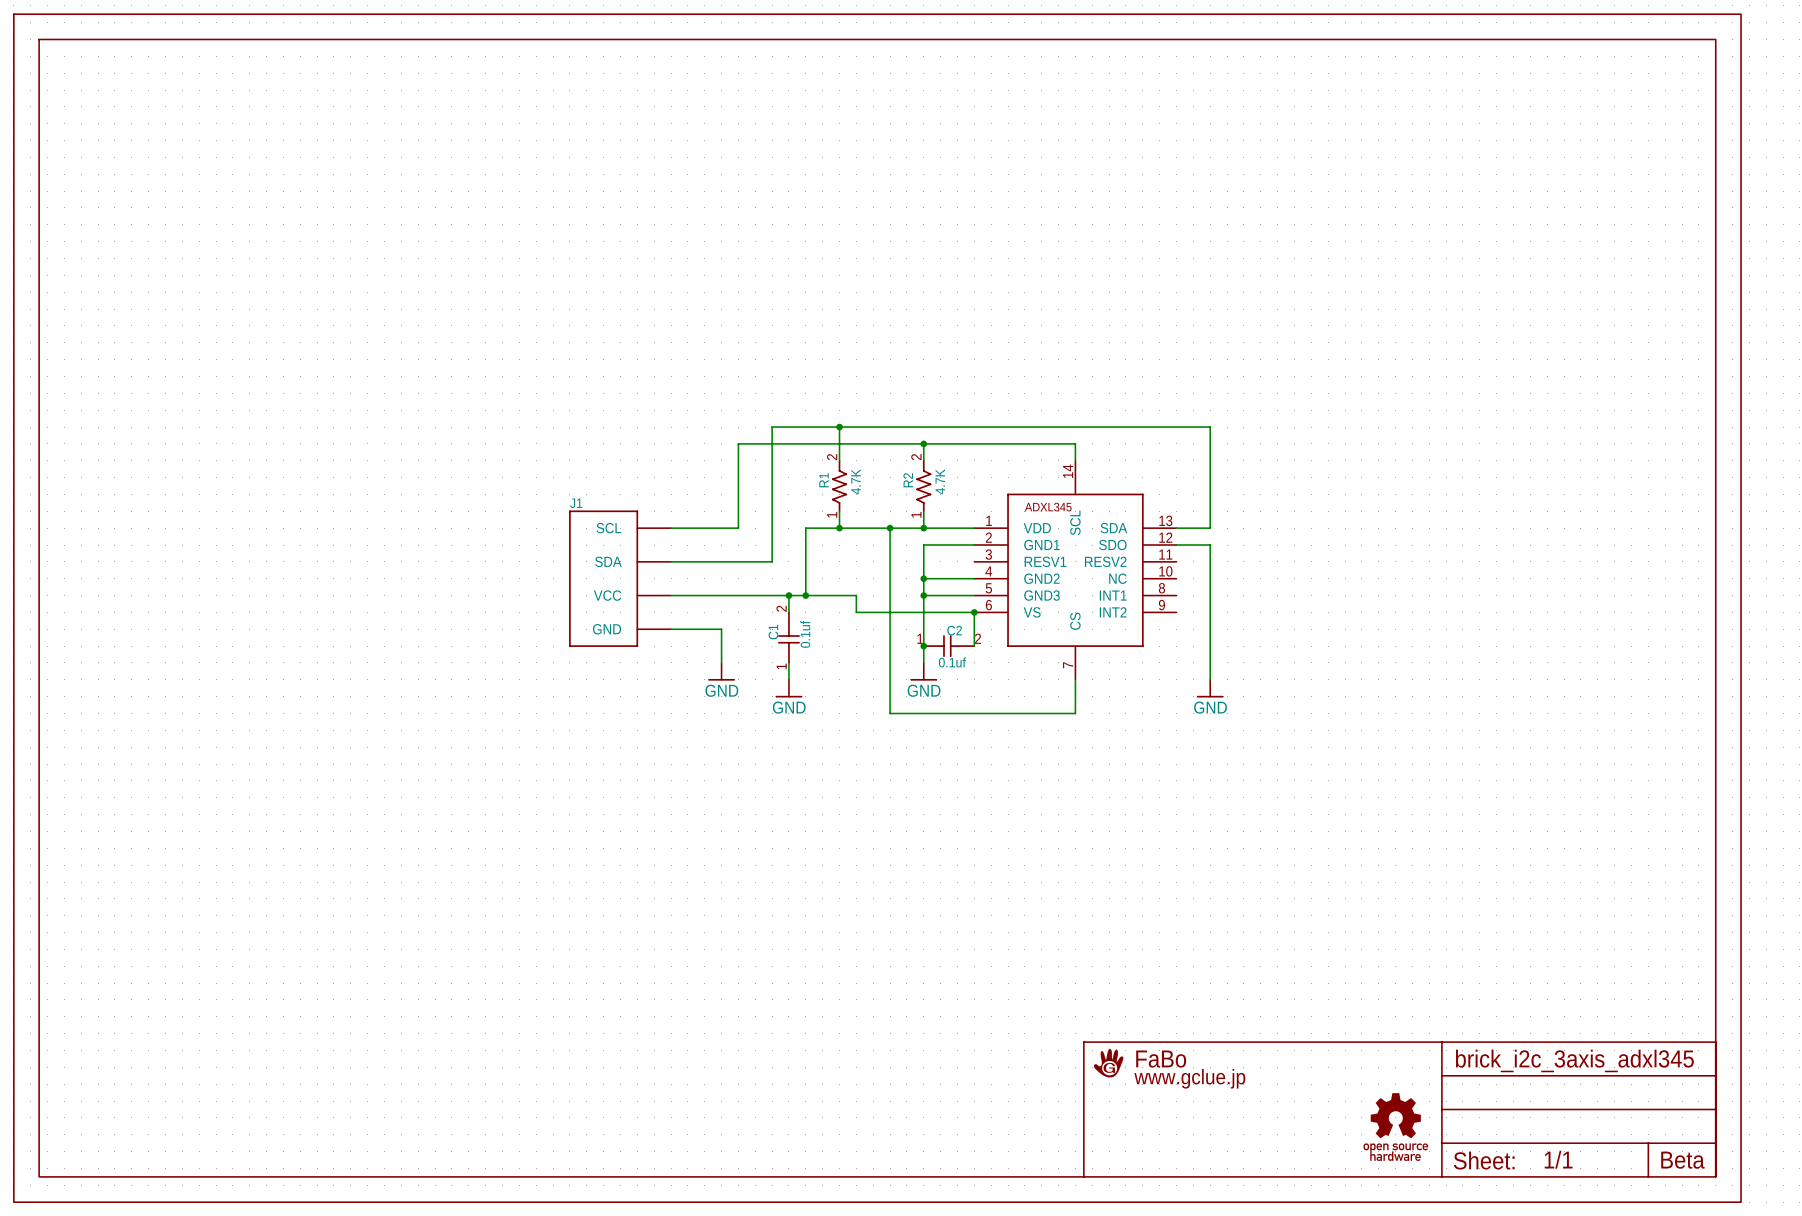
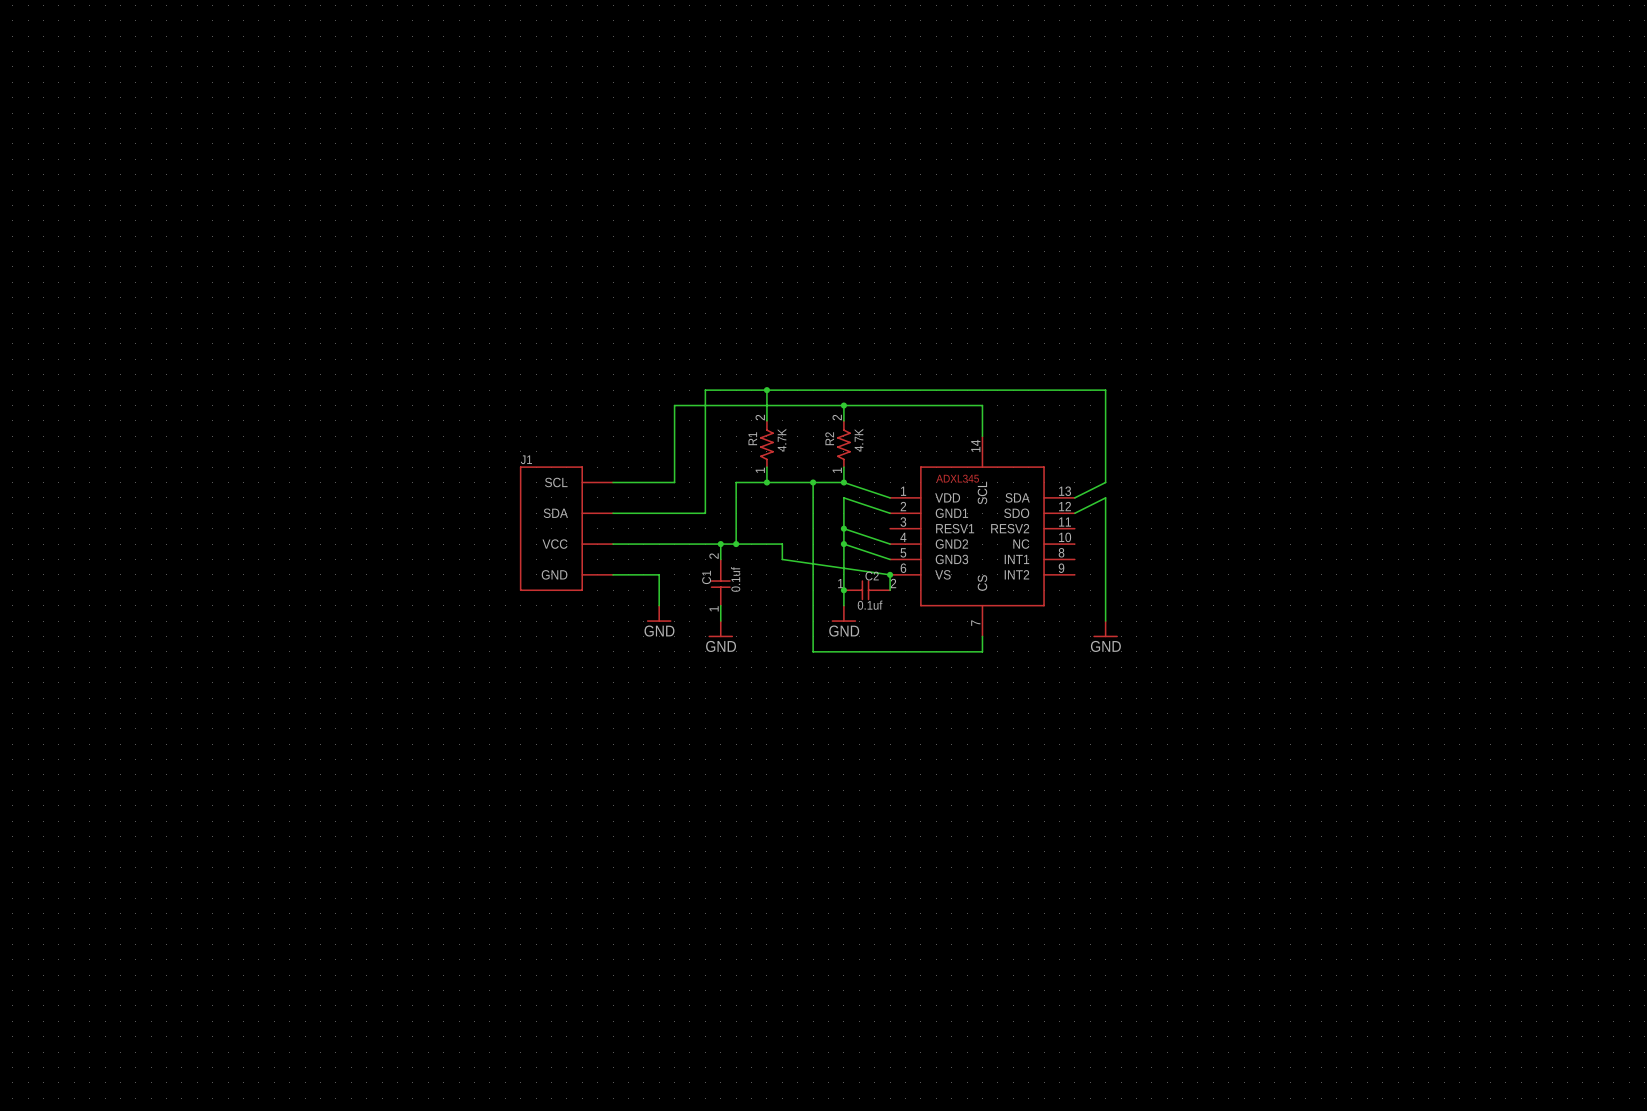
wire: (923, 528) (974, 528) -> (843, 482) (890, 497)
wire: (1176, 528) (1210, 528) -> (1074, 497) (1105, 482)
wire: (923, 545) (974, 545) -> (843, 497) (890, 513)
wire: (1176, 545) (1210, 545) -> (1074, 513) (1105, 497)
part position: (1075, 570) -> (982, 536)
wire: (923, 578) (974, 578) -> (843, 528) (890, 544)
wire: (923, 595) (974, 595) -> (843, 544) (890, 559)
part: (877, 608) -> none
wire: (856, 612) (974, 612) (974, 629) -> (782, 559) (890, 574)
junction position: (974, 612) -> (890, 574)
part: (1395, 1127) -> none
text: Beta (1682, 1160) -> none

